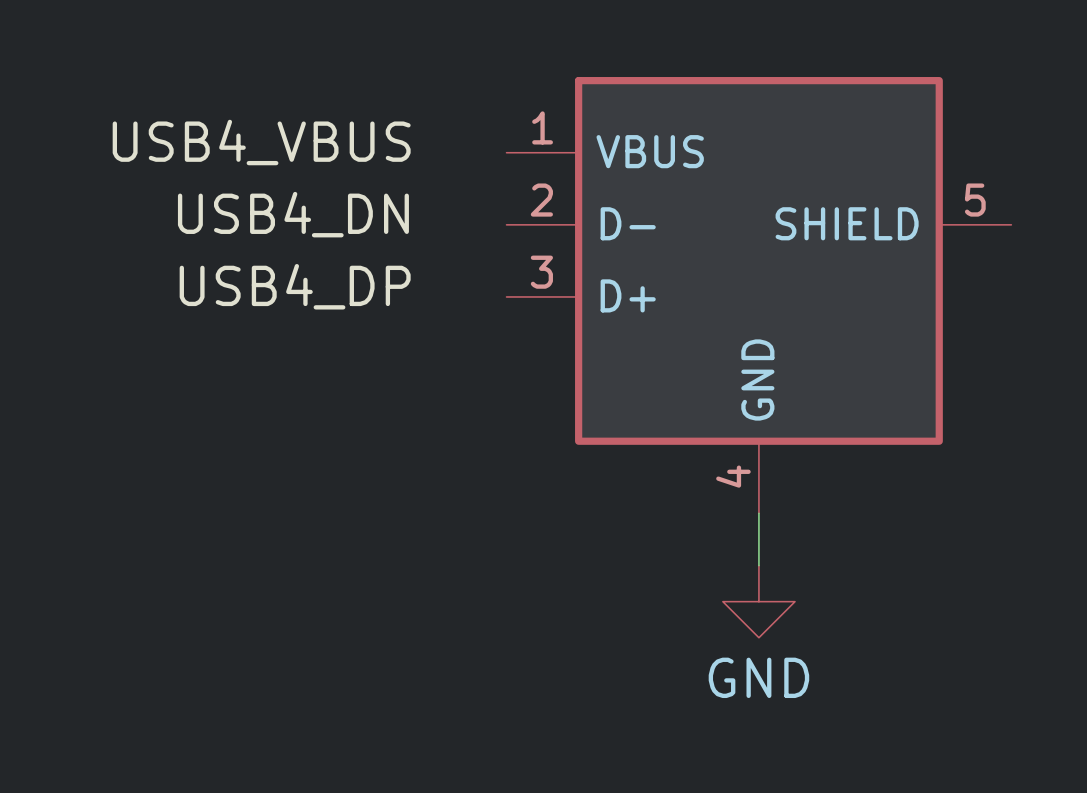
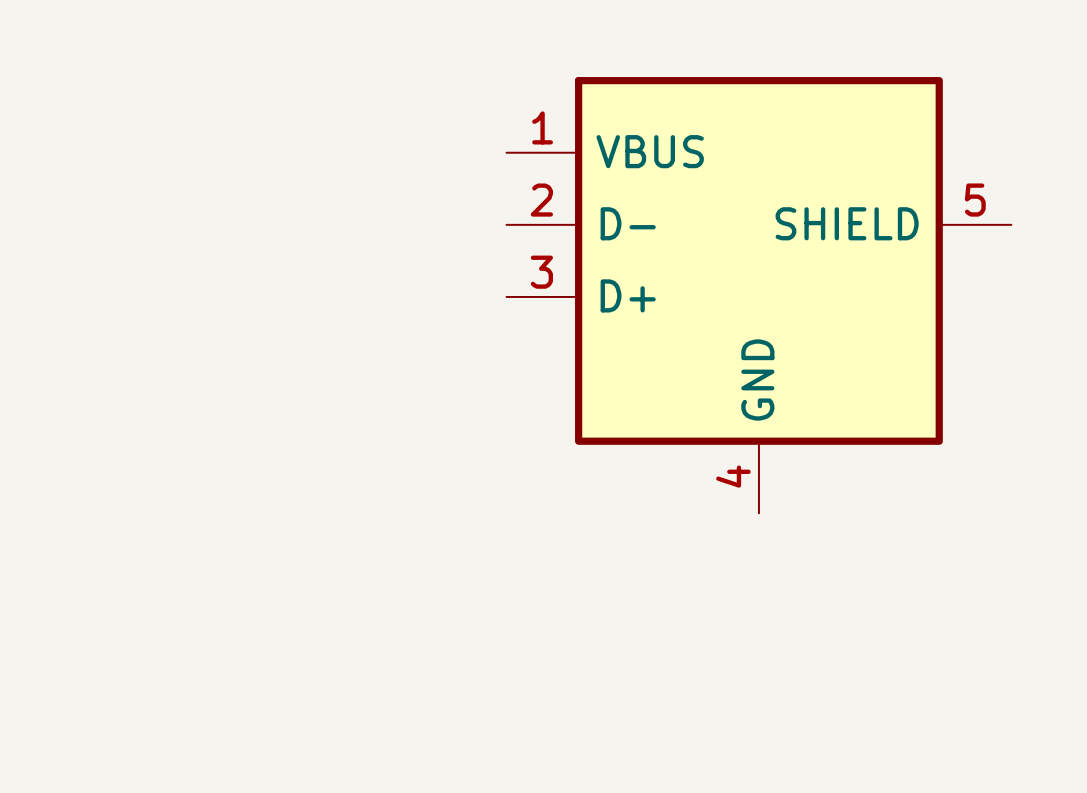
label: USB4_VBUS (261, 142) -> none
label: USB4_DN (293, 214) -> none
label: USB4_DP (295, 286) -> none
wire: (758, 513) (758, 565) -> none
power symbol: GND (758, 601) -> none

